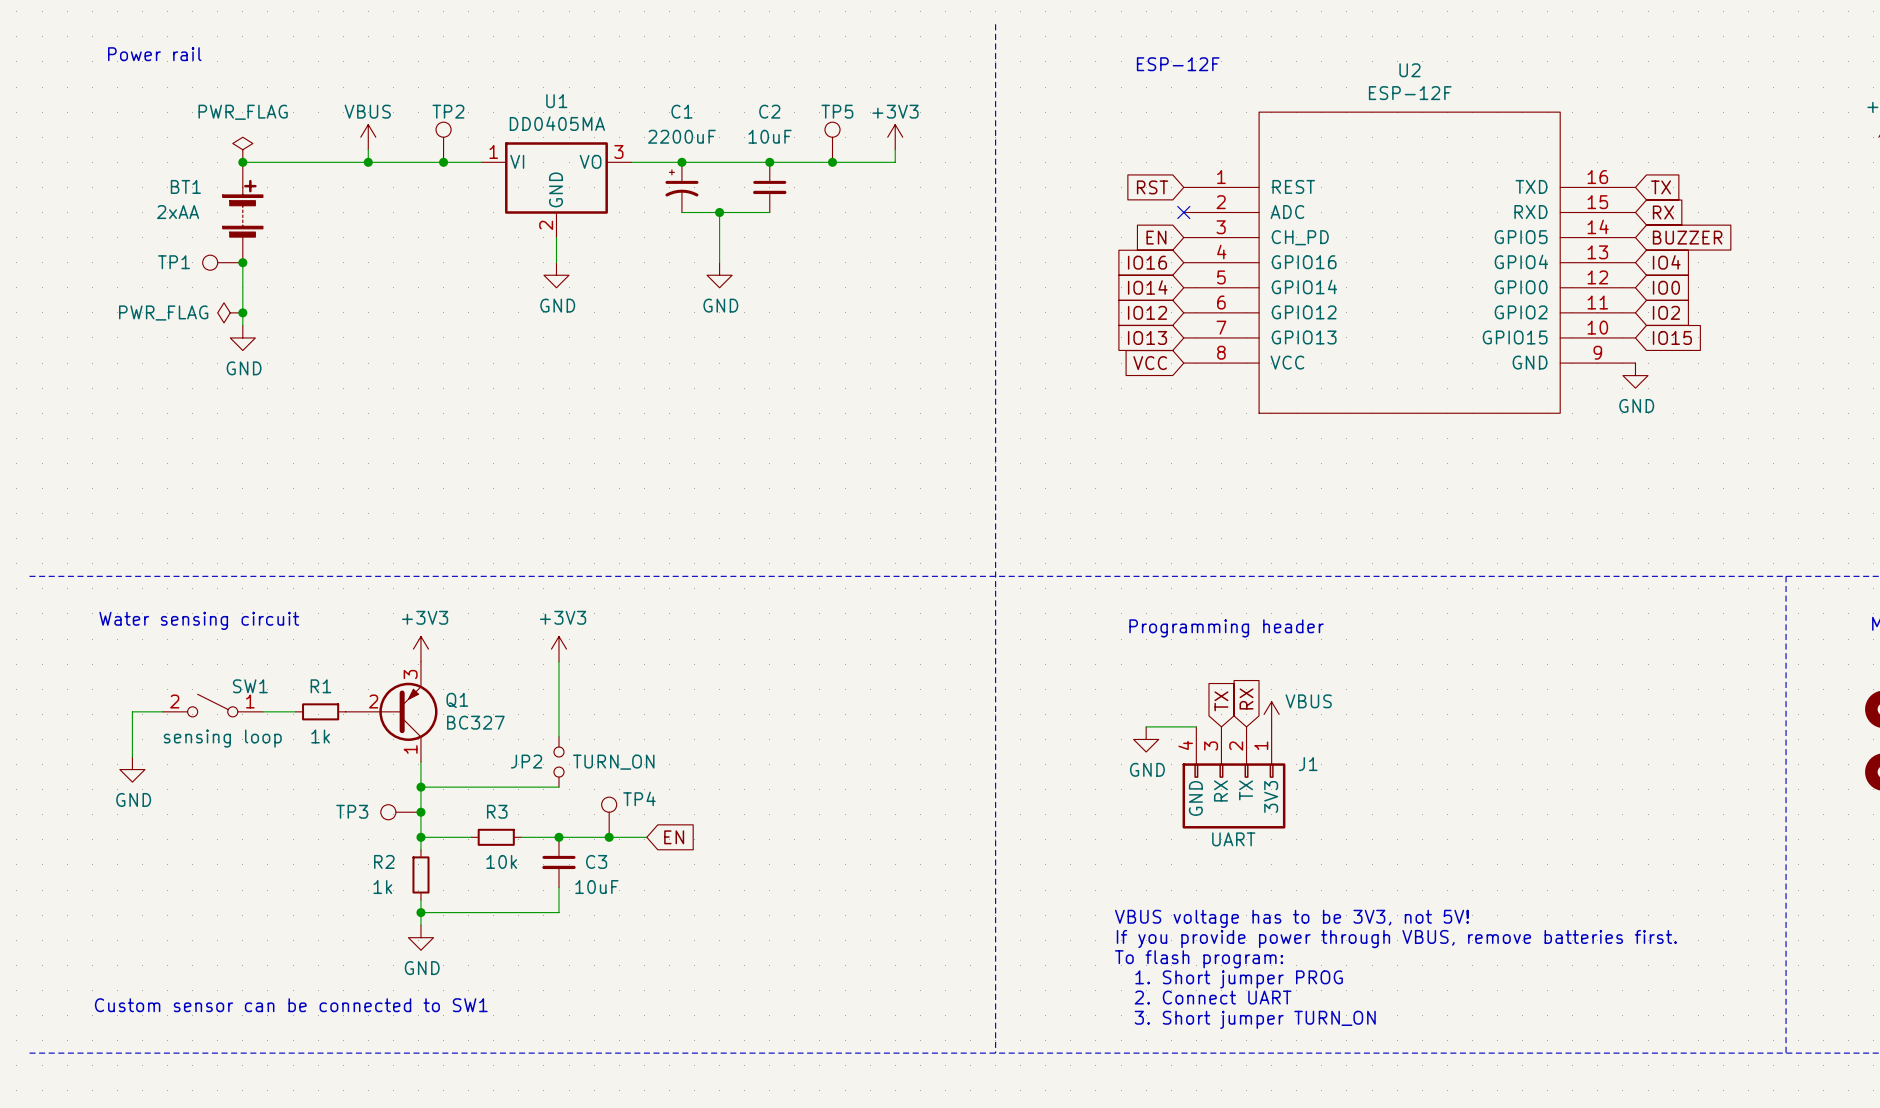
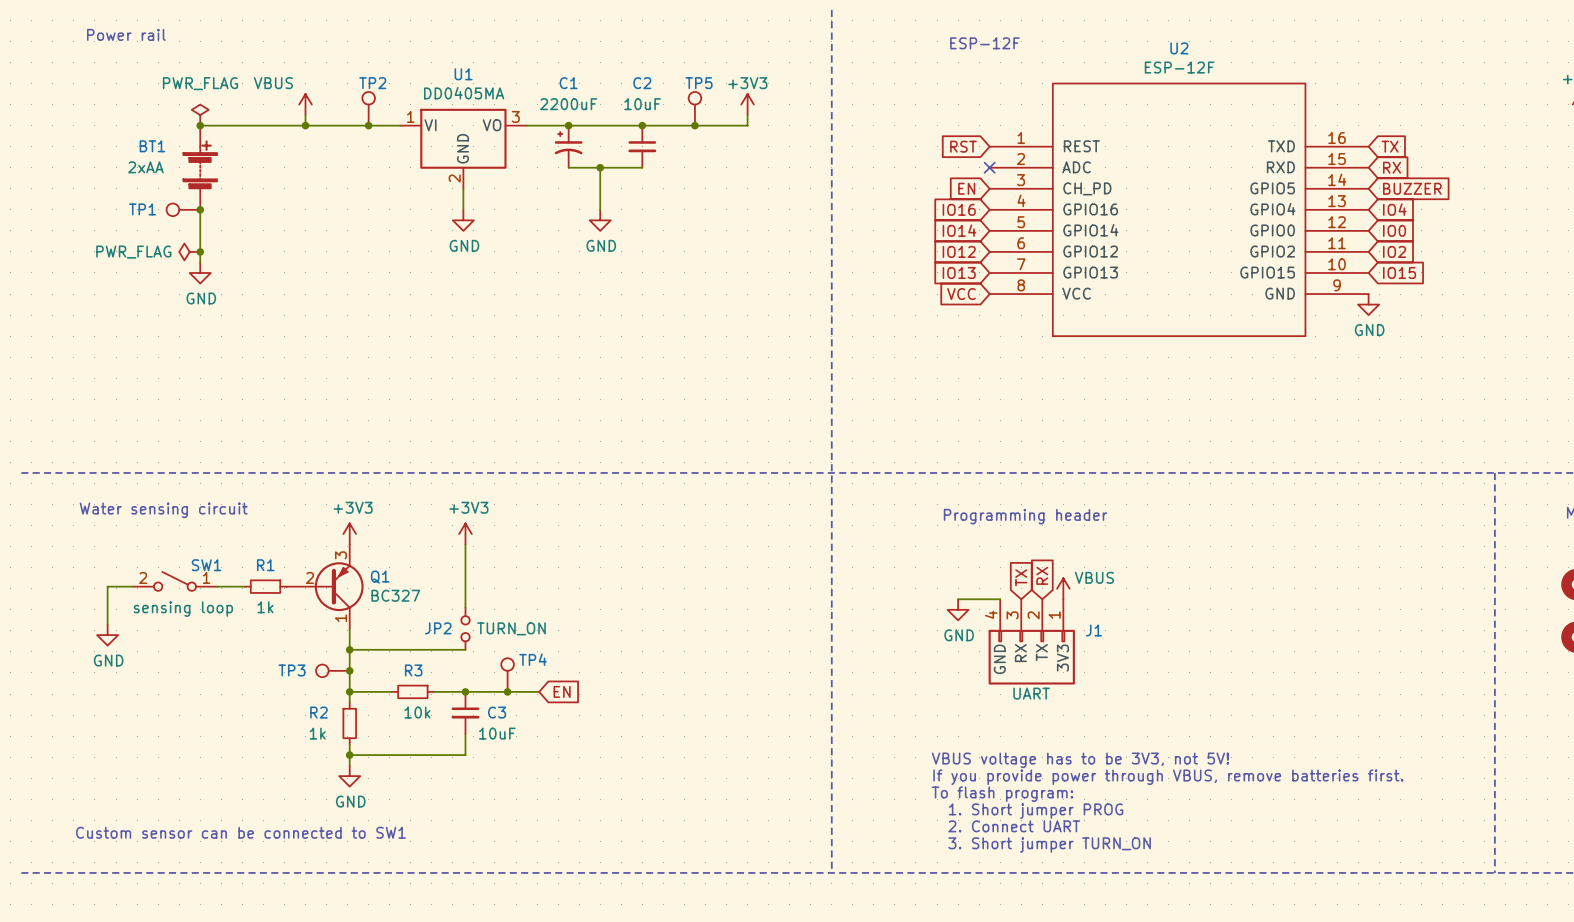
power symbol text position: VBUS (367, 111) -> VBUS (273, 83)

